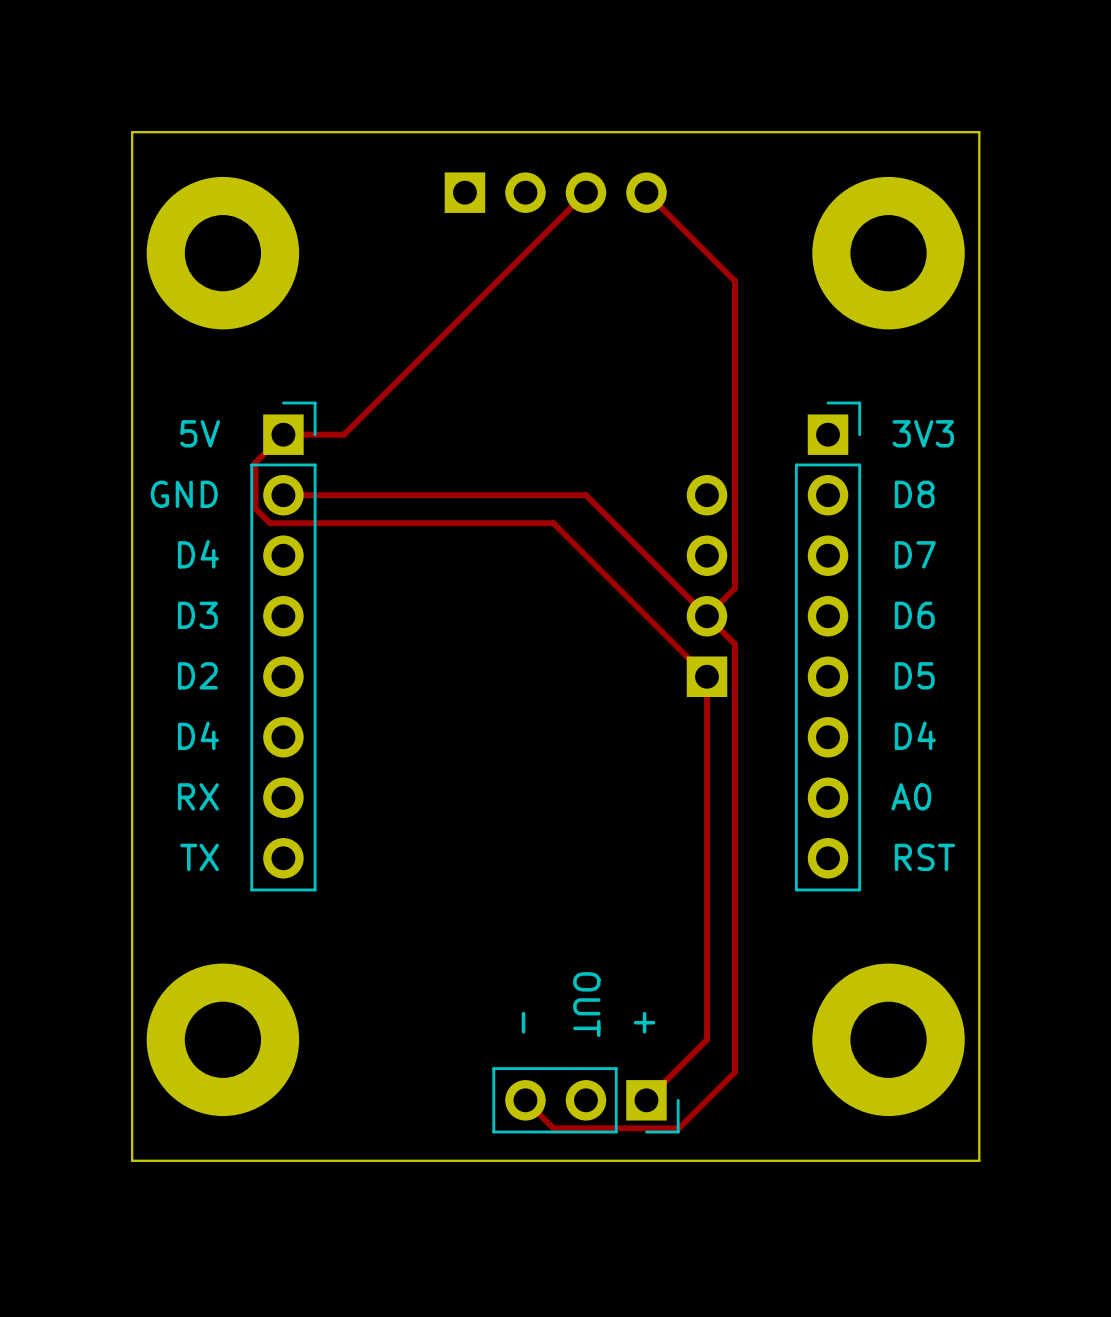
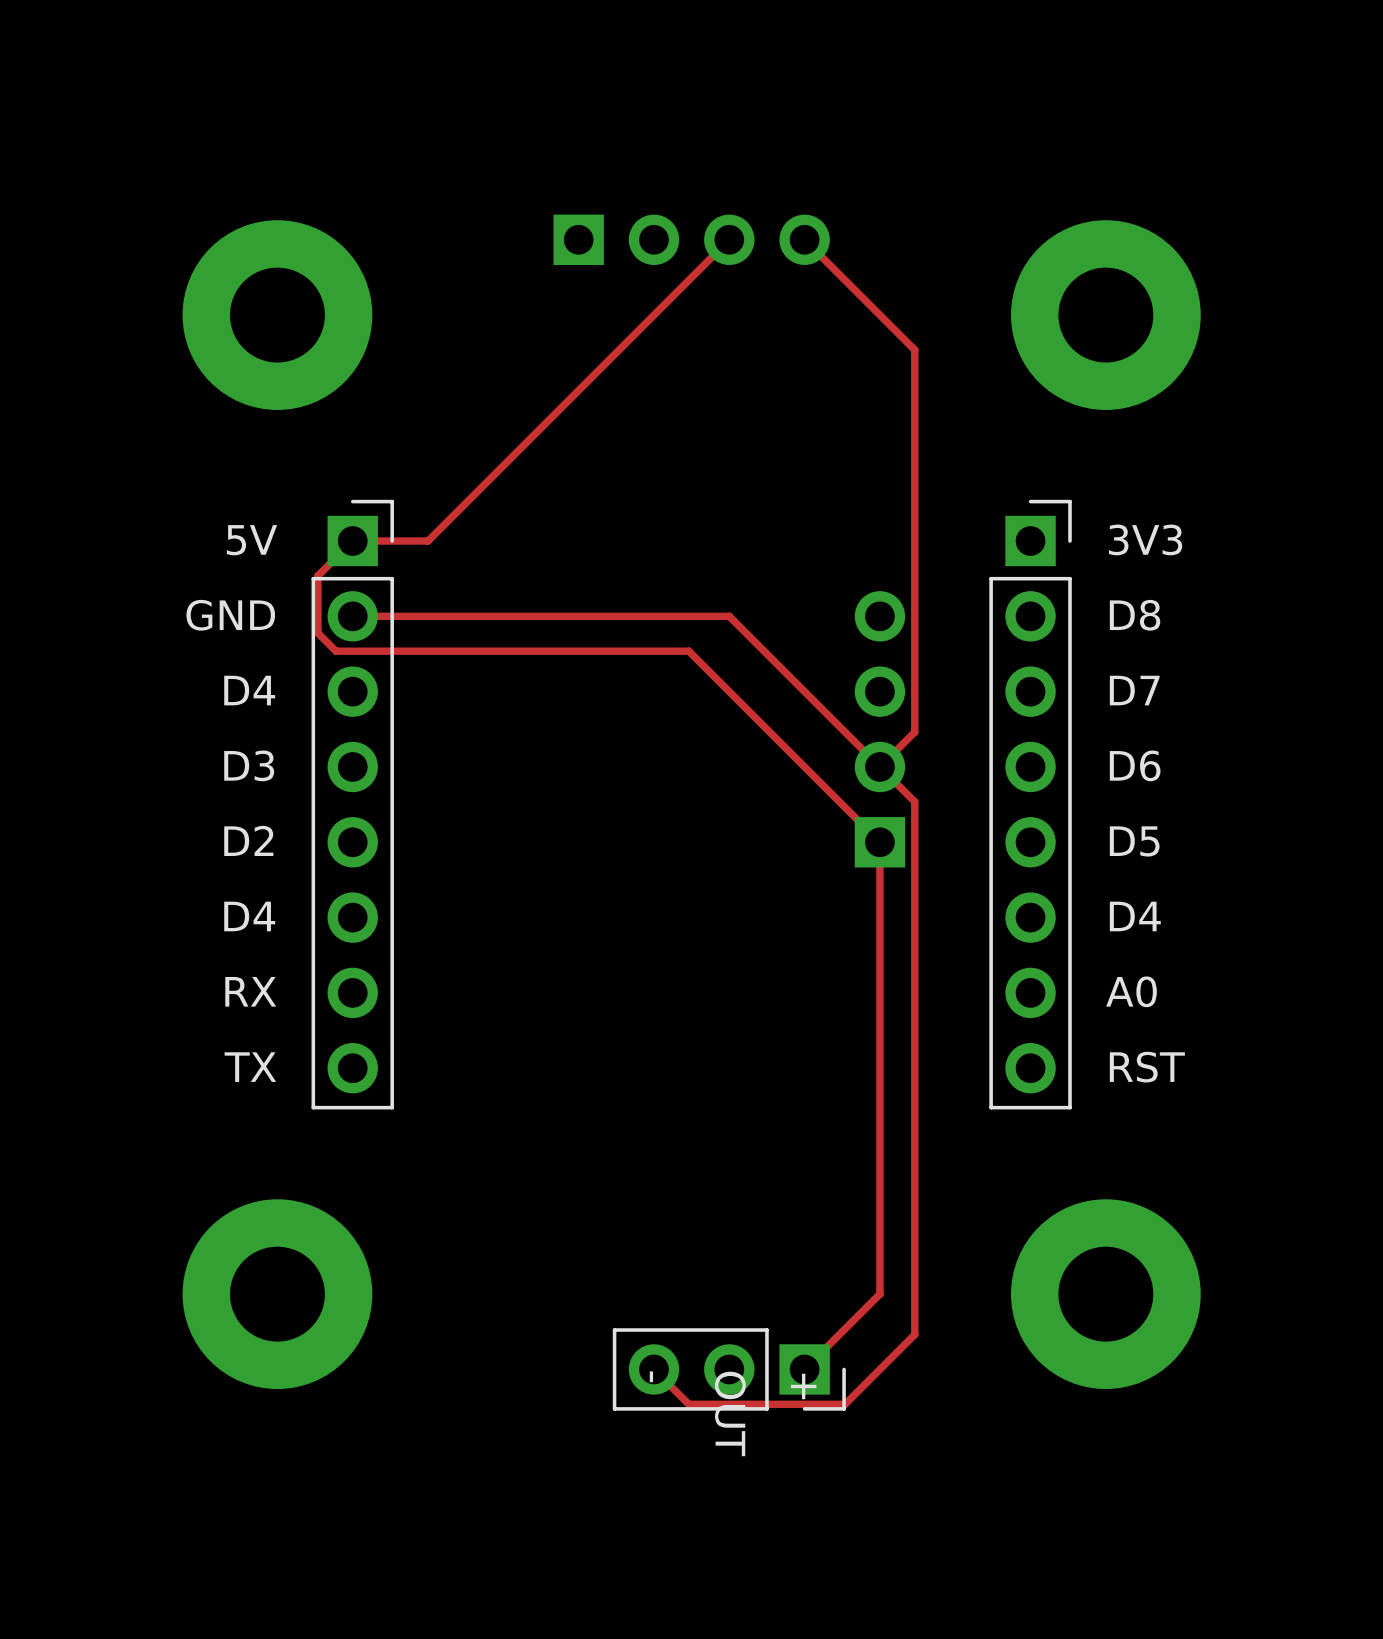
board edge: (132, 132) (979, 132) (979, 1160) (132, 1160) (132, 132) -> none
text position: OUT (586, 1004) -> OUT (730, 1413)
text position: - (523, 1022) -> - (651, 1376)
text position: + (644, 1022) -> + (803, 1386)

